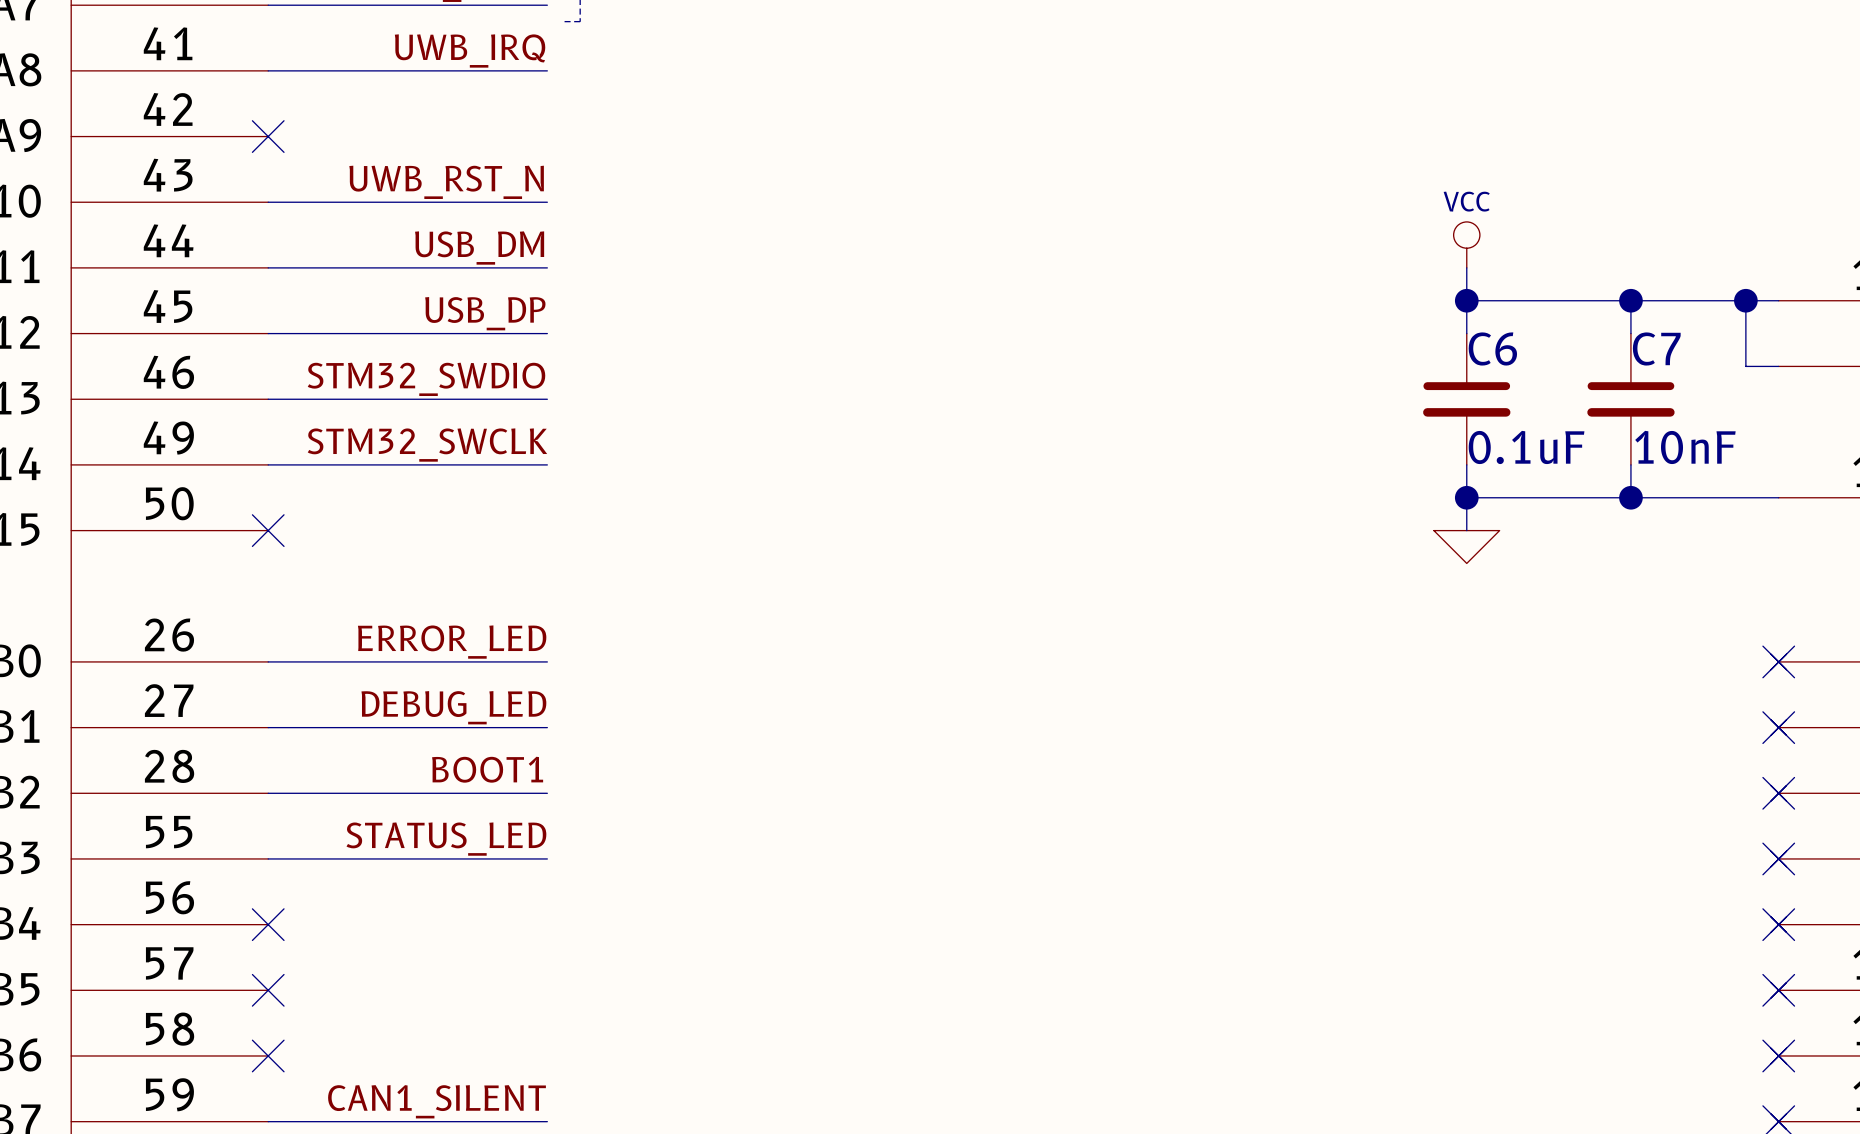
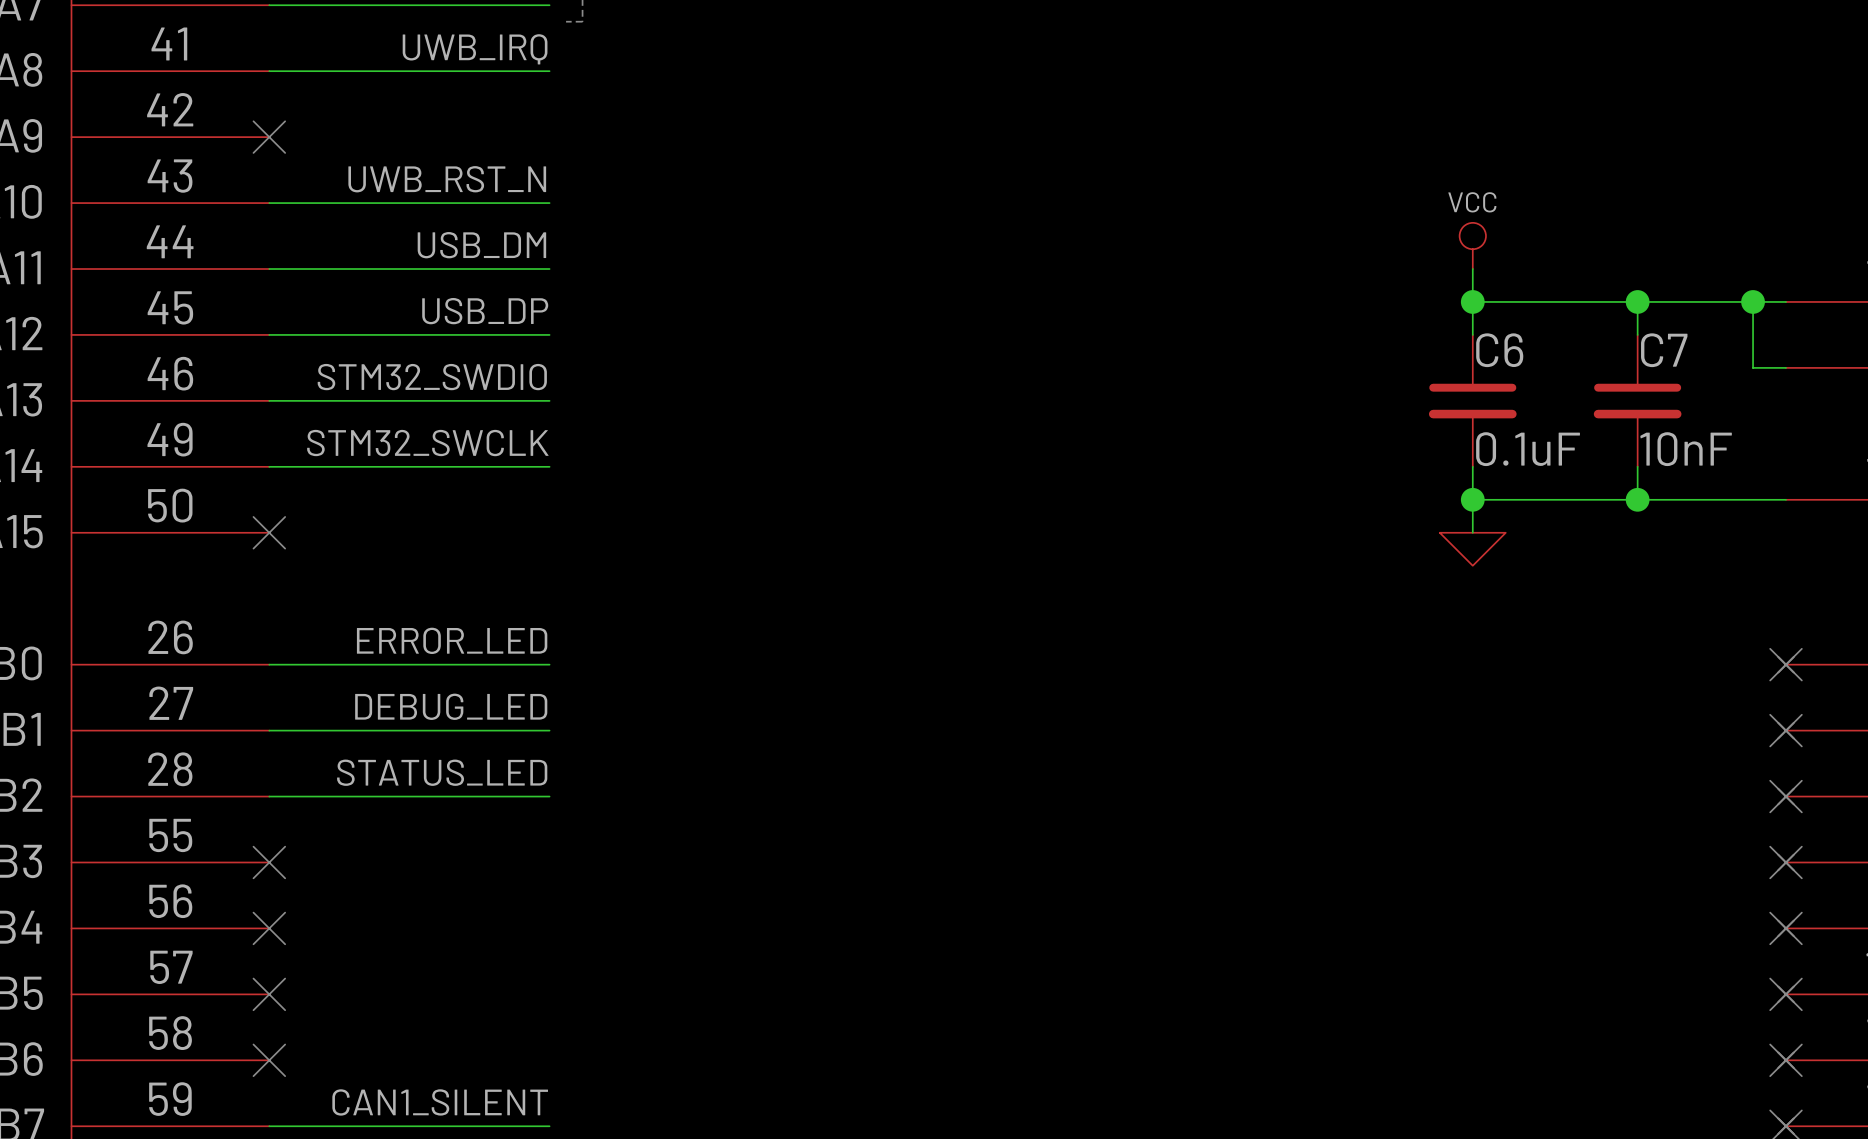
label: BOOT1 (487, 769) -> STATUS_LED (442, 772)
label: STATUS_LED (446, 839) -> none
wire: (268, 858) (547, 858) -> none
no-connect mark: none -> (269, 862)

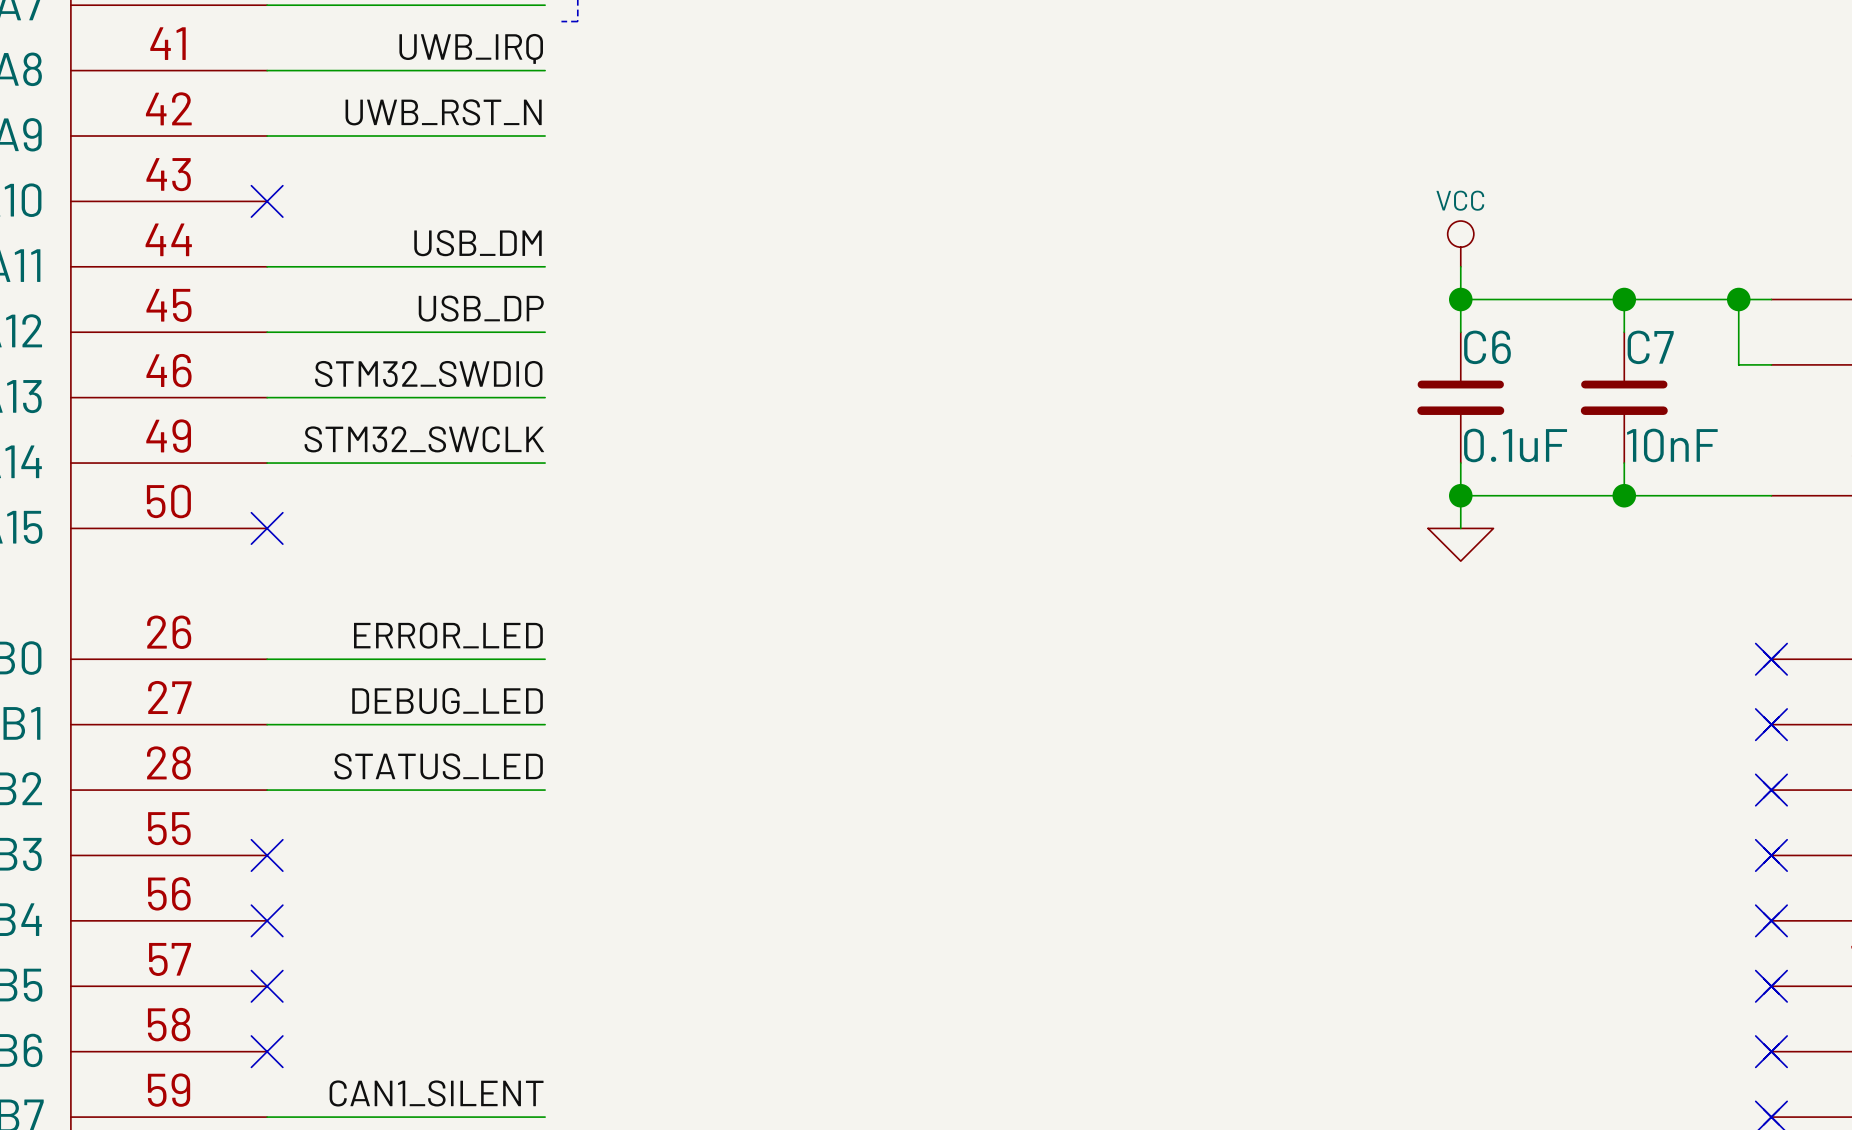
no-connect mark position: (269, 137) -> (267, 201)
label position: UWB_RST_N (447, 179) -> UWB_RST_N (443, 112)
wire: (269, 203) (549, 203) -> (267, 136) (545, 136)

